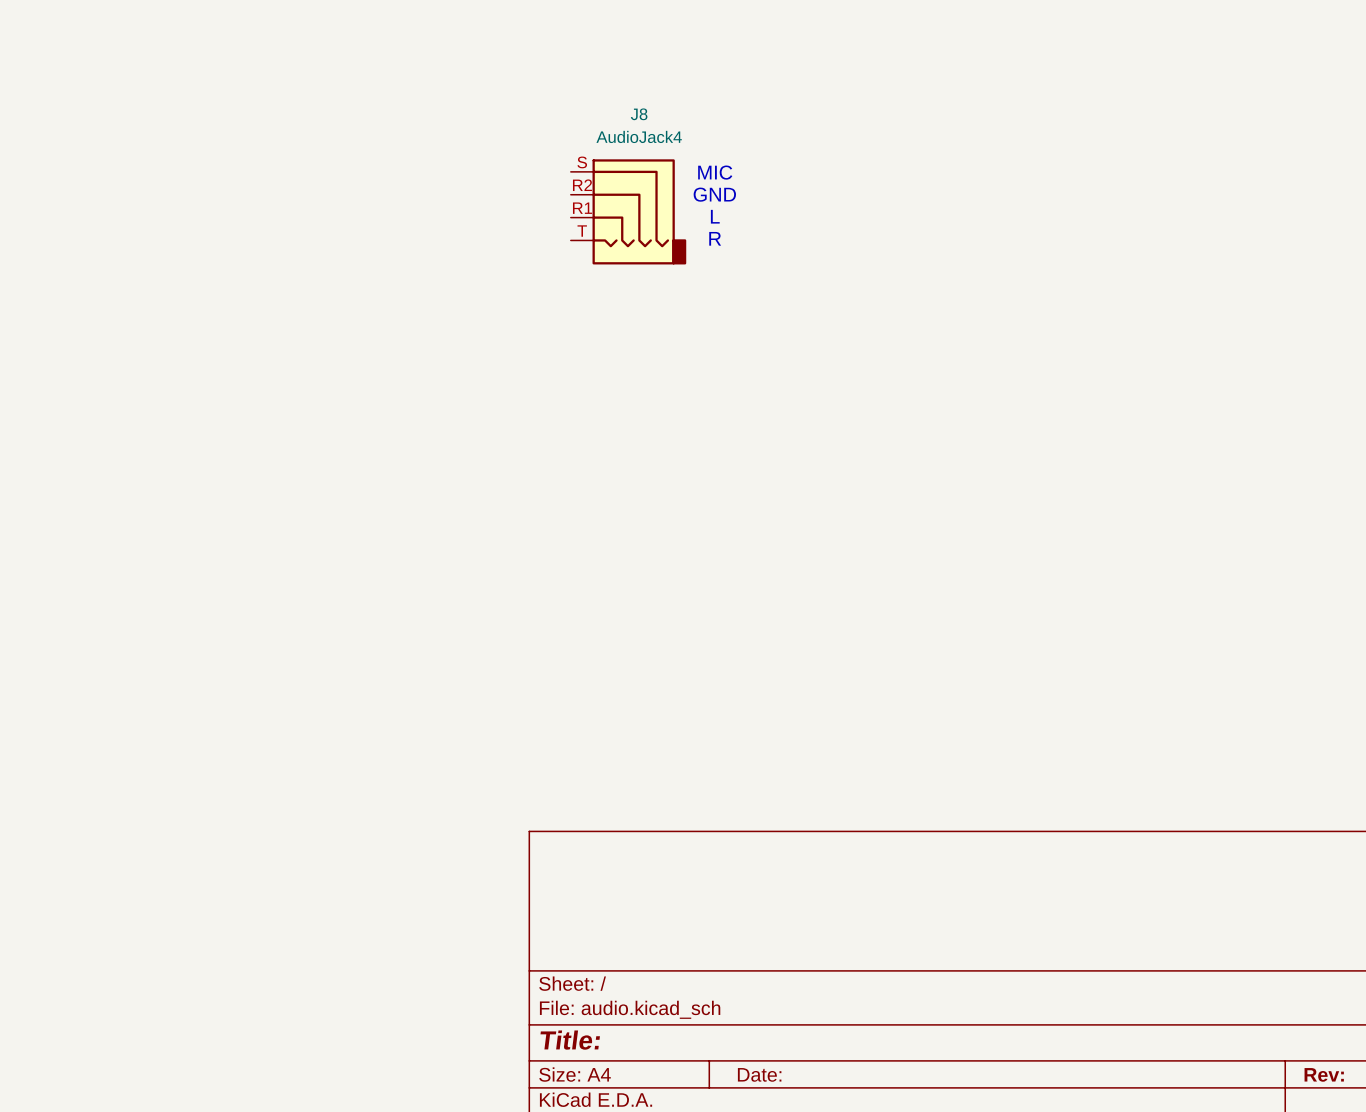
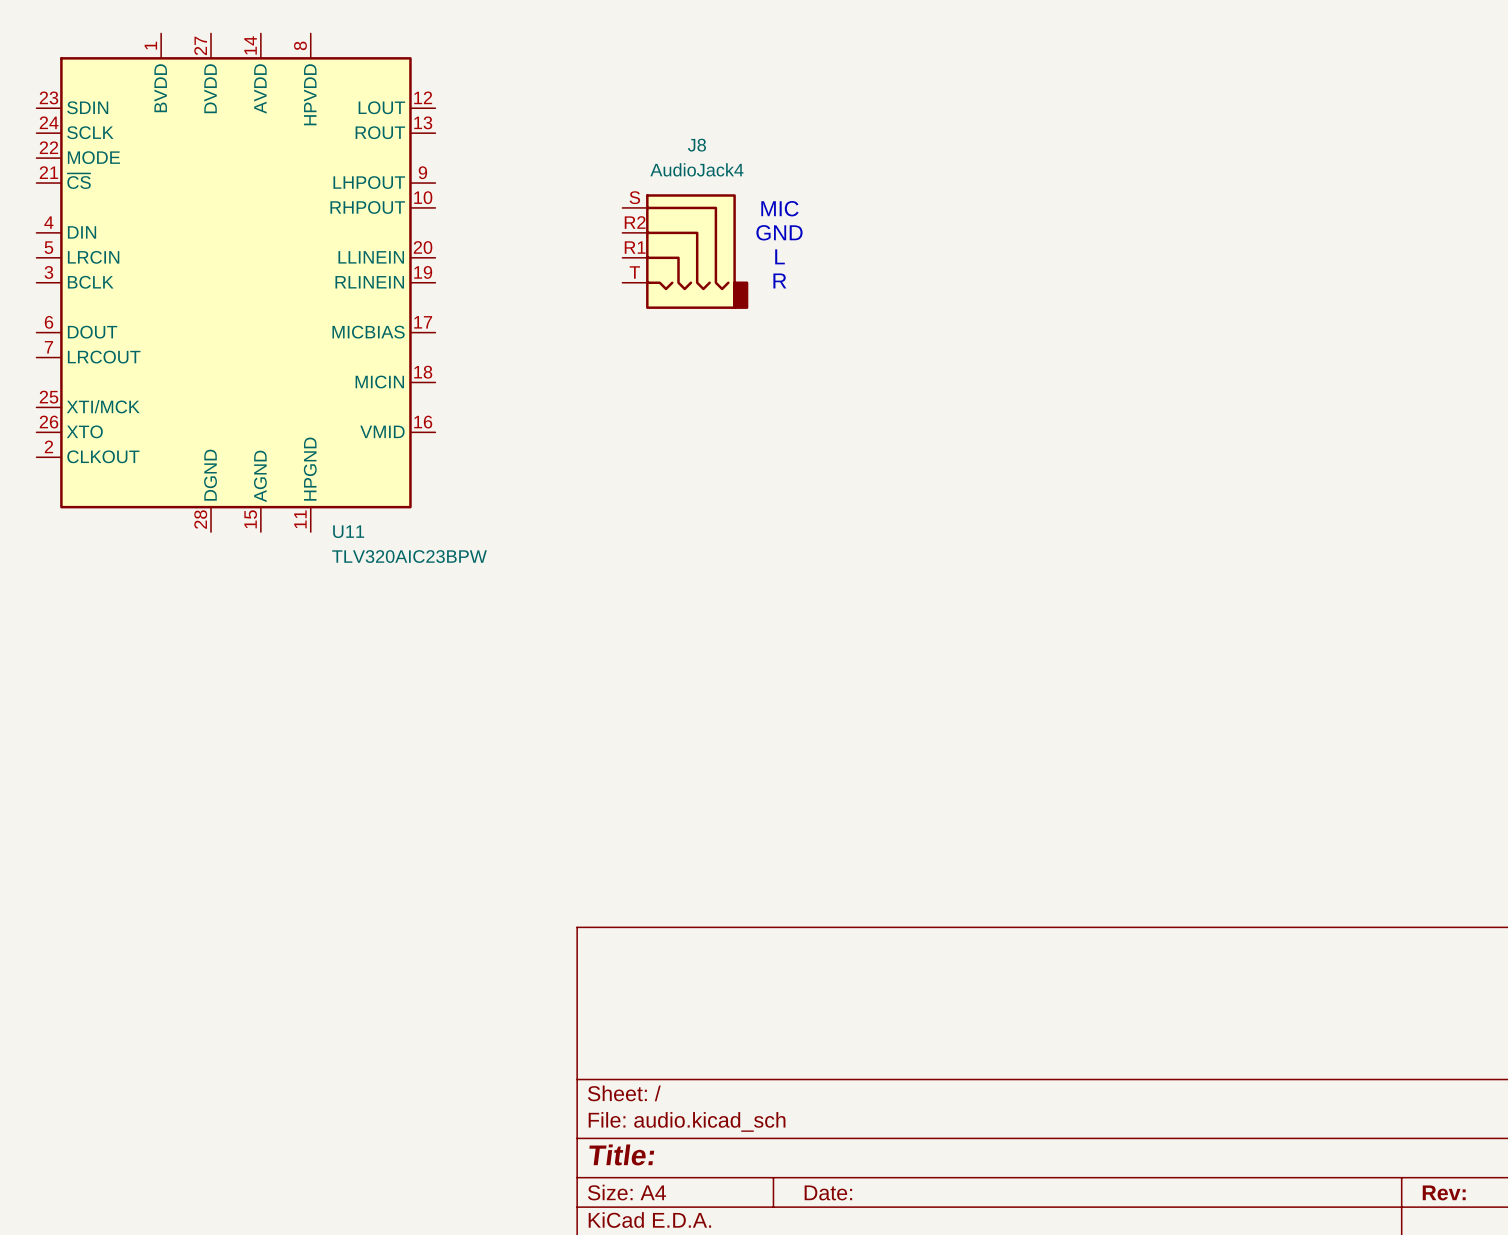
U11: none -> TLV320AIC23BPW (235, 282)

